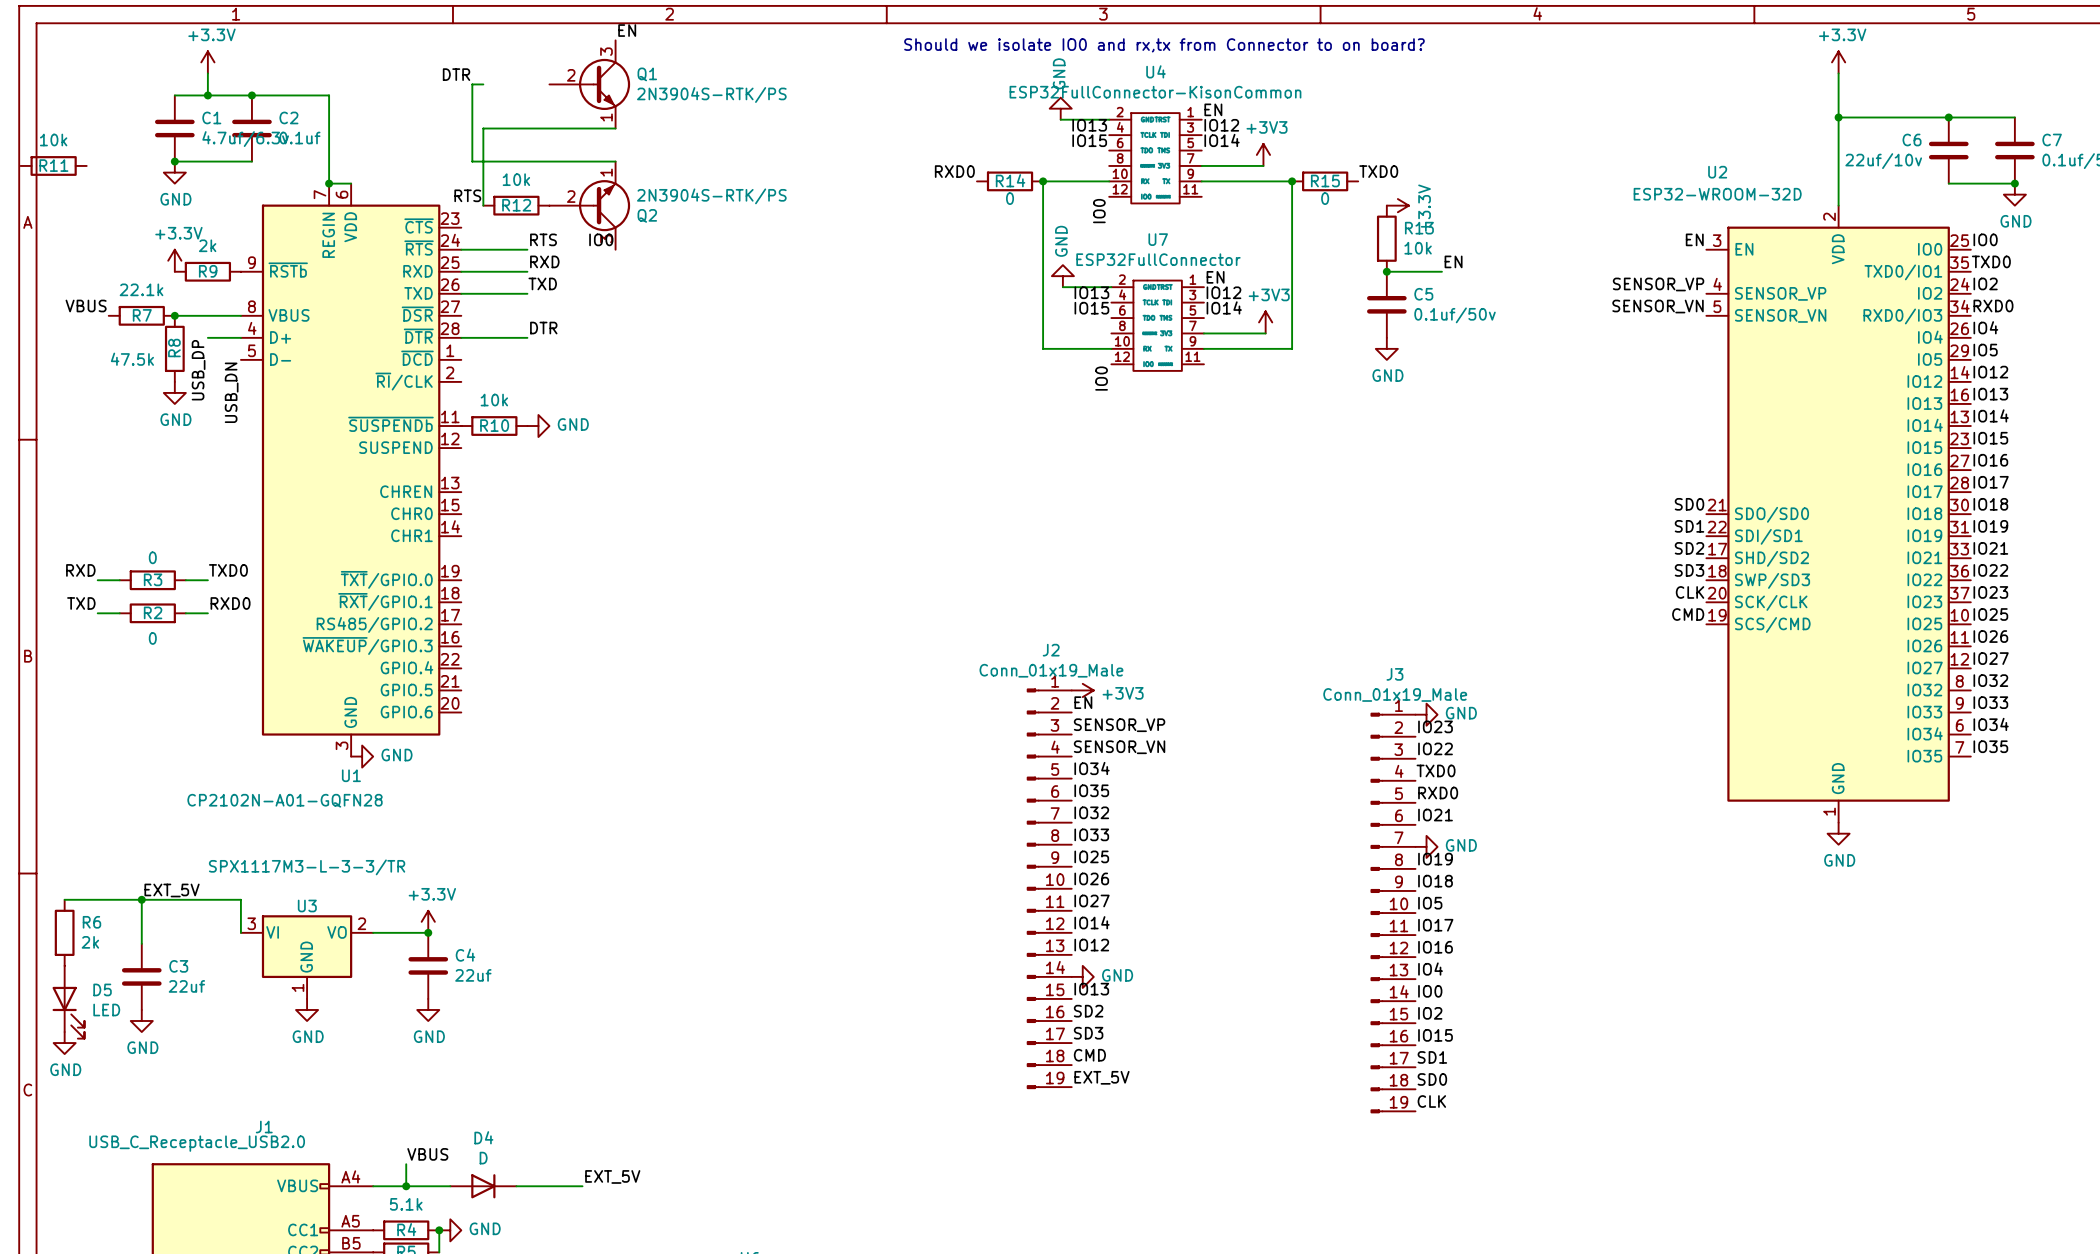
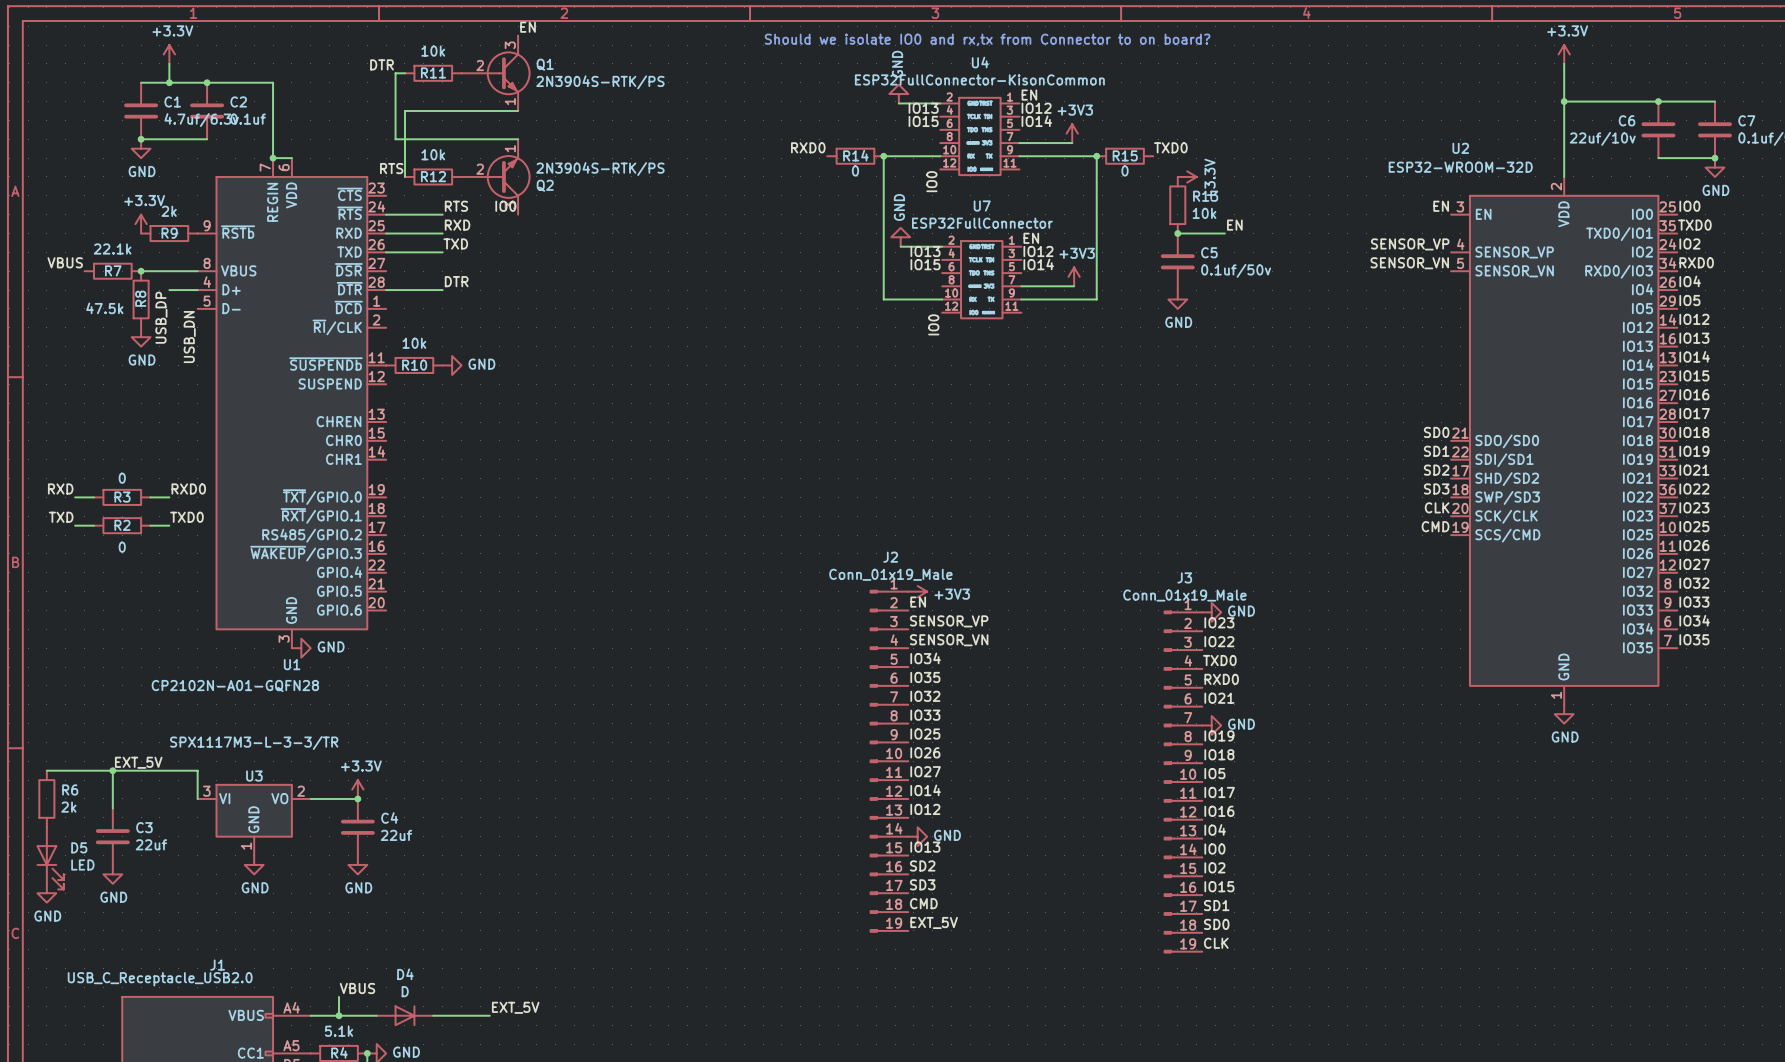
R11 position: (53, 165) -> (433, 73)
label: TXD0 (228, 570) -> RXD0 (188, 488)
label: RXD0 (230, 603) -> TXD0 (186, 517)

